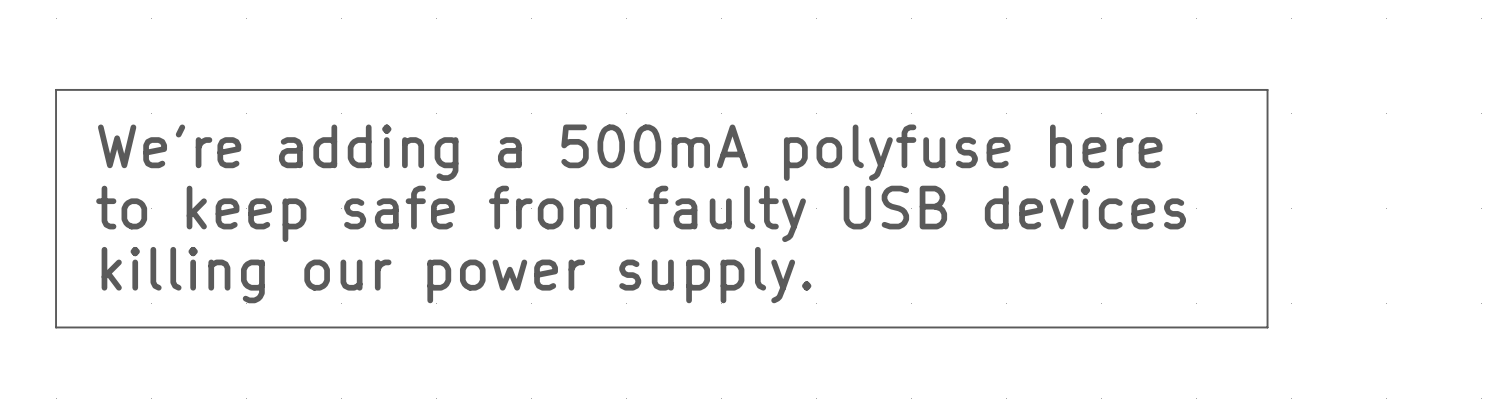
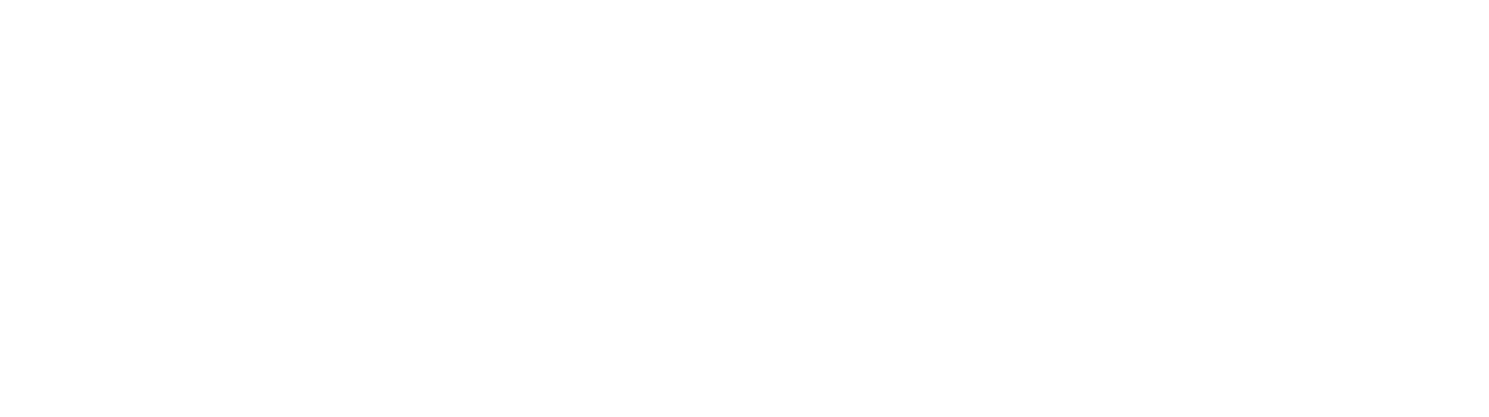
line: (56, 89) (1267, 89) (1267, 327) (56, 327) (56, 89) -> none
text: We're adding a 500mA polyfuse here (630, 152) -> none
text: to keep safe from faulty USB devices (641, 213) -> none
text: killing our power supply. (456, 275) -> none

